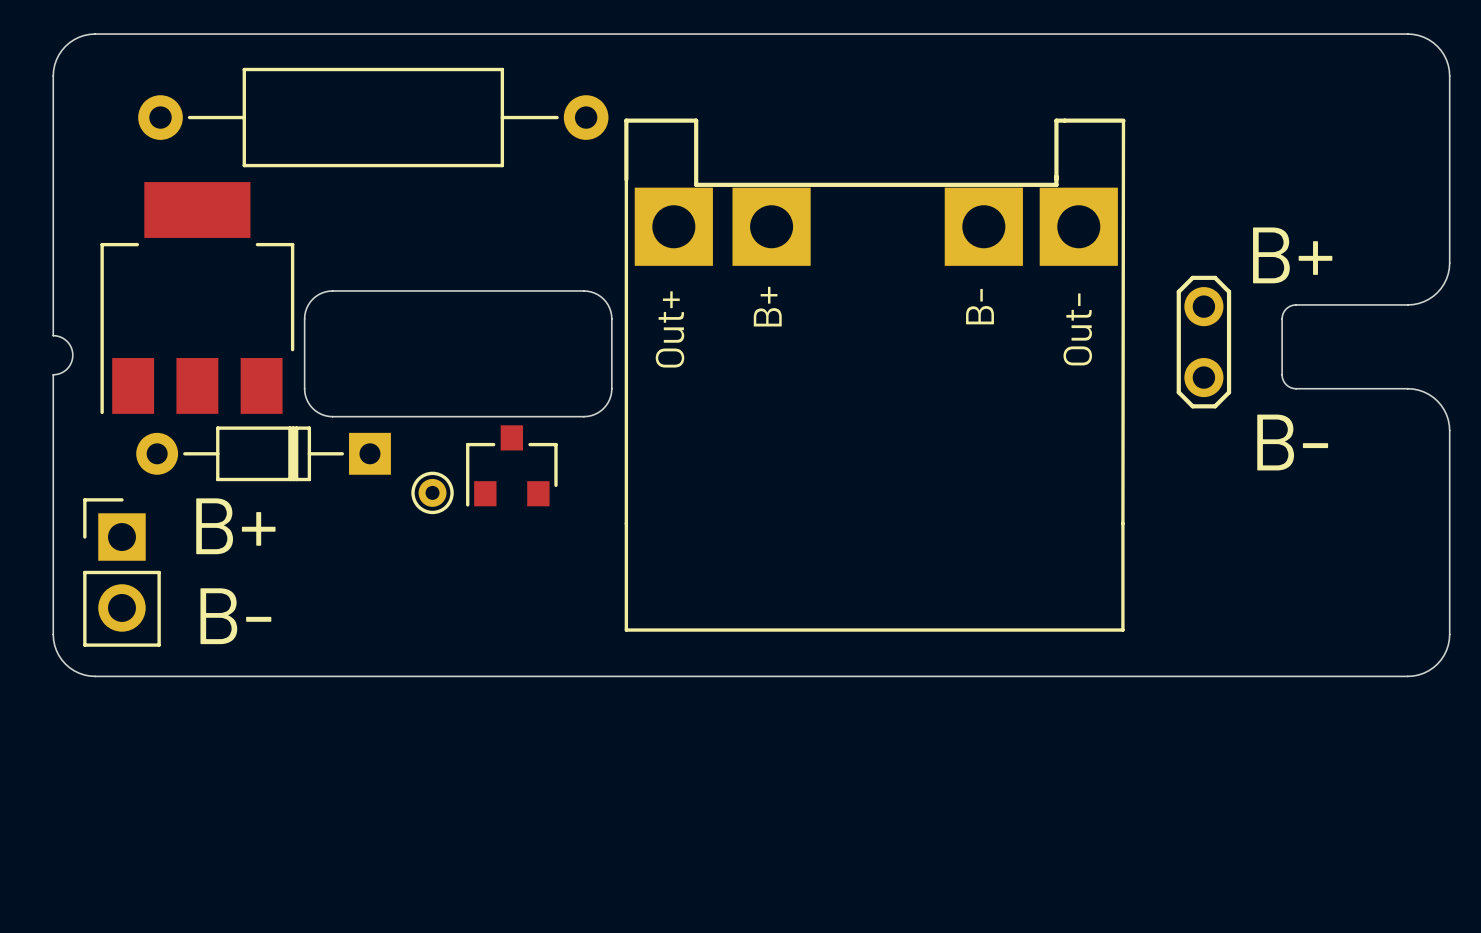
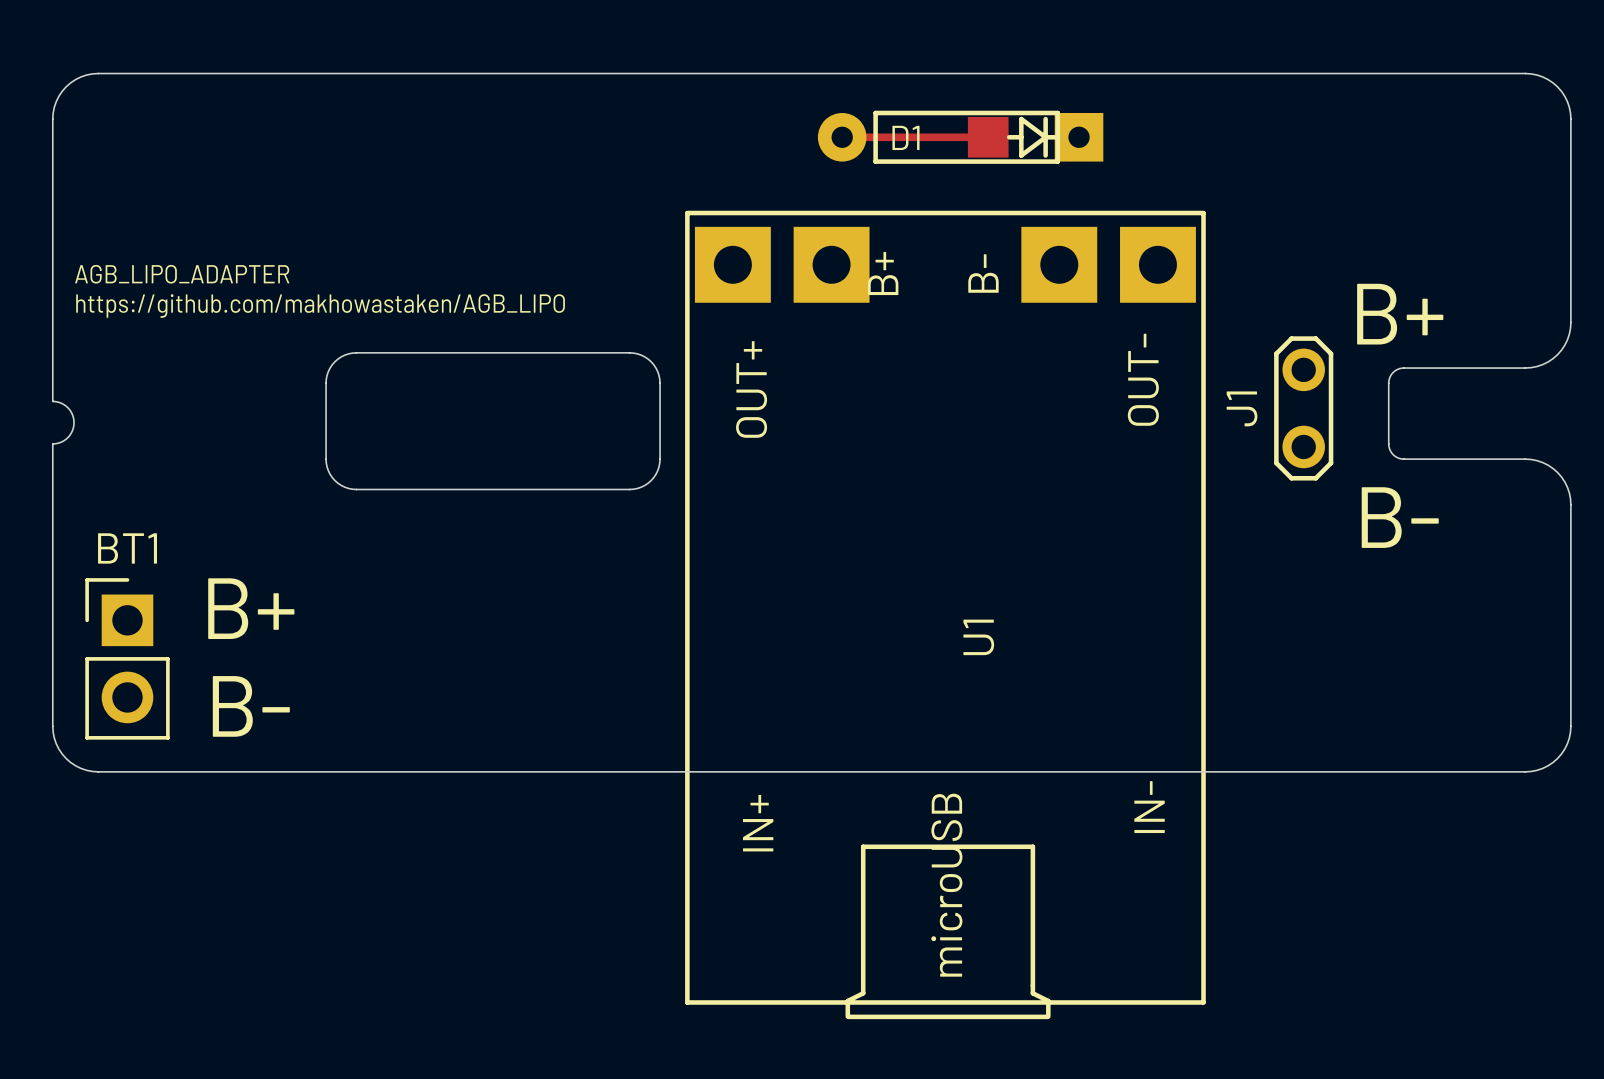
D1: none -> (960, 137)
part: (373, 117) -> none
text: none -> AGB_LIPO_ADAPTER (182, 274)
text: none -> https://github.com/makhowastaken/AGB_LIPO (320, 306)
part: (197, 298) -> none
J1 name: none -> J1 (1242, 408)
part: (874, 375) -> none
part: (263, 453) -> none
part: (511, 465) -> none
BT1 name: none -> BT1 (127, 548)
part: (432, 492) -> none
U1: none -> (945, 614)

